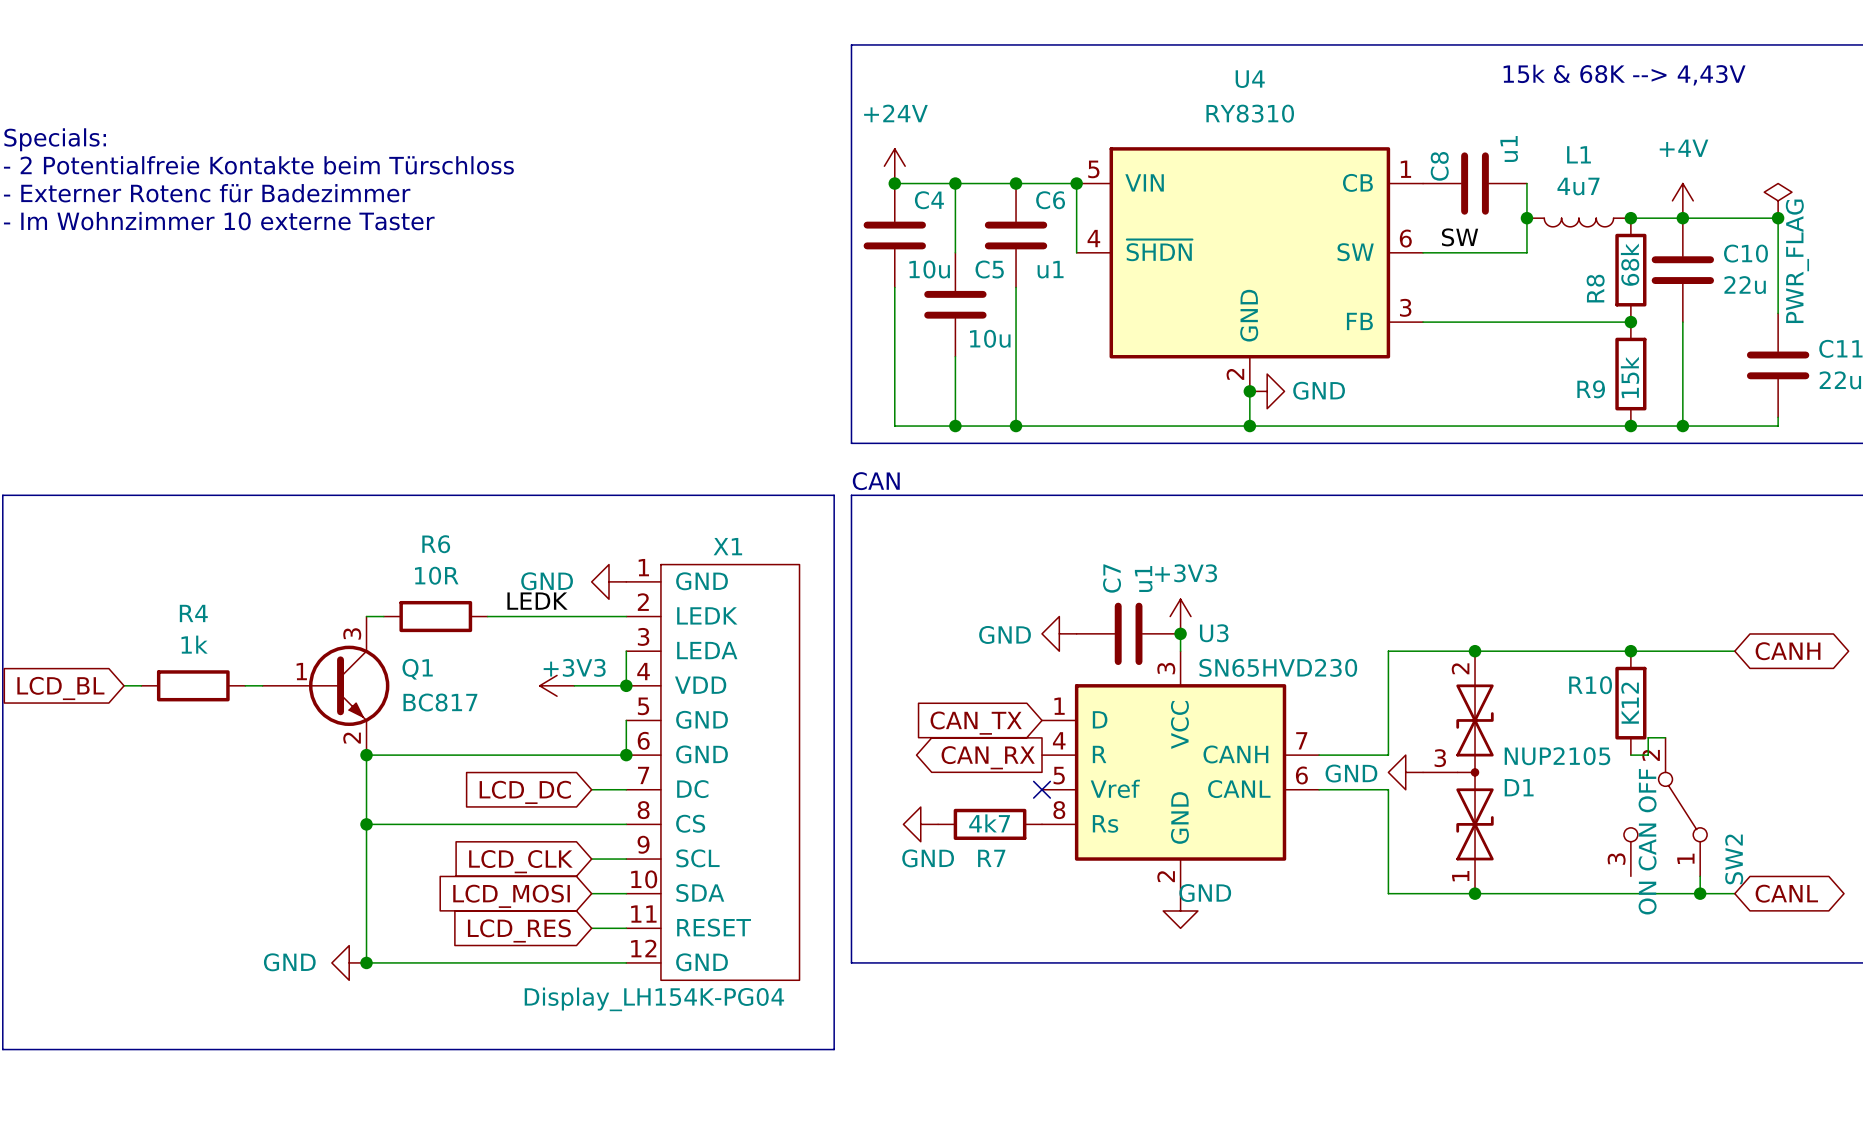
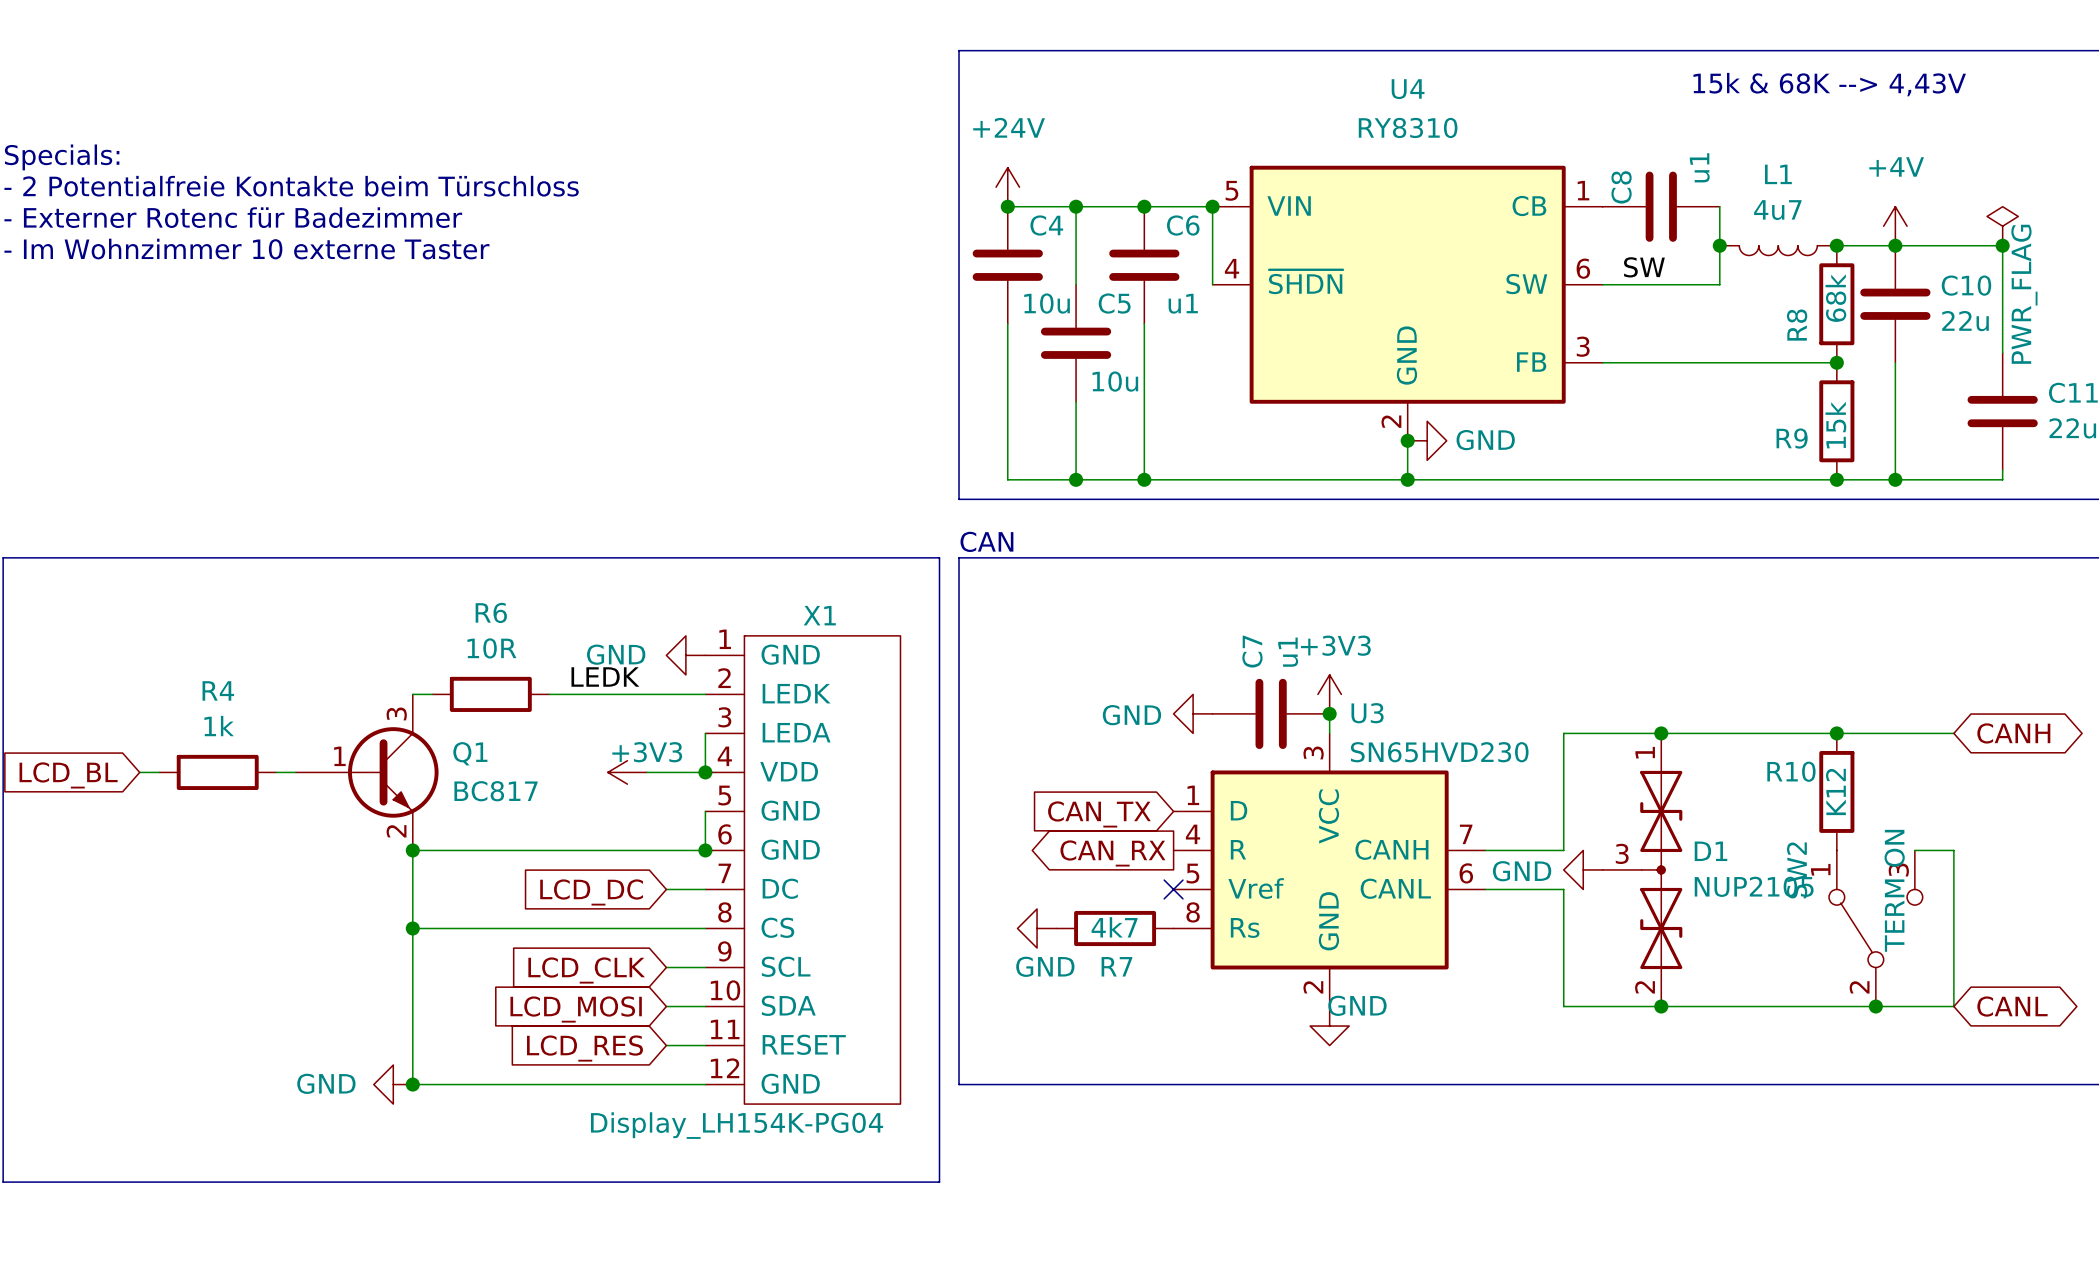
wire: (1665, 737) (1648, 737) (1648, 755) (1630, 755) -> none
wire: none -> (1914, 850) (1953, 850) (1953, 1006)
D1 flip: as is (1475, 772) -> up-down (1661, 869)
SW2 rotation: 0° (1665, 807) -> 180° (1875, 928)
SW2 value: ON CAN OFF (1647, 841) -> TERM ON (1894, 890)
wire: (1700, 876) (1700, 893) -> none
junction position: (1700, 893) -> (1875, 1006)

